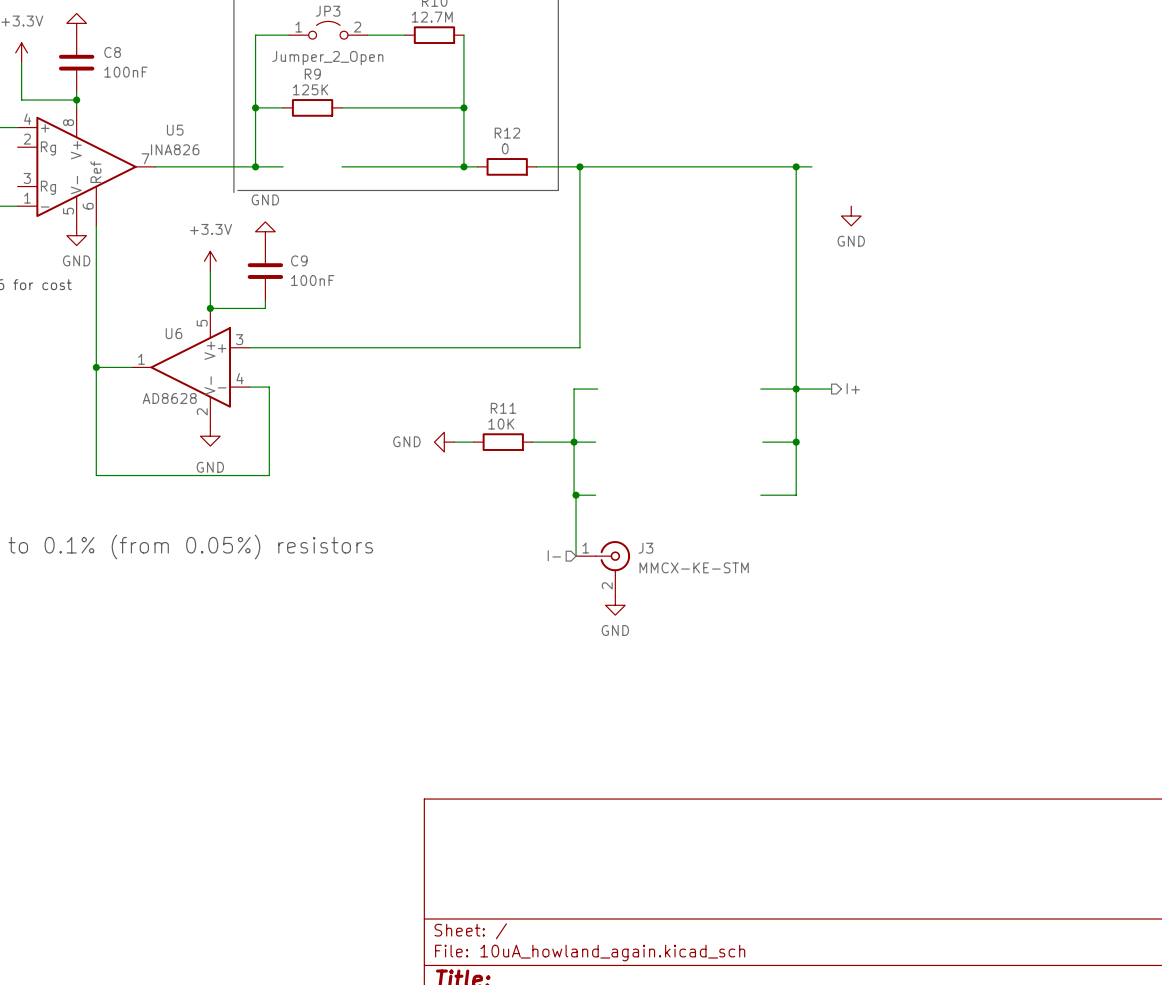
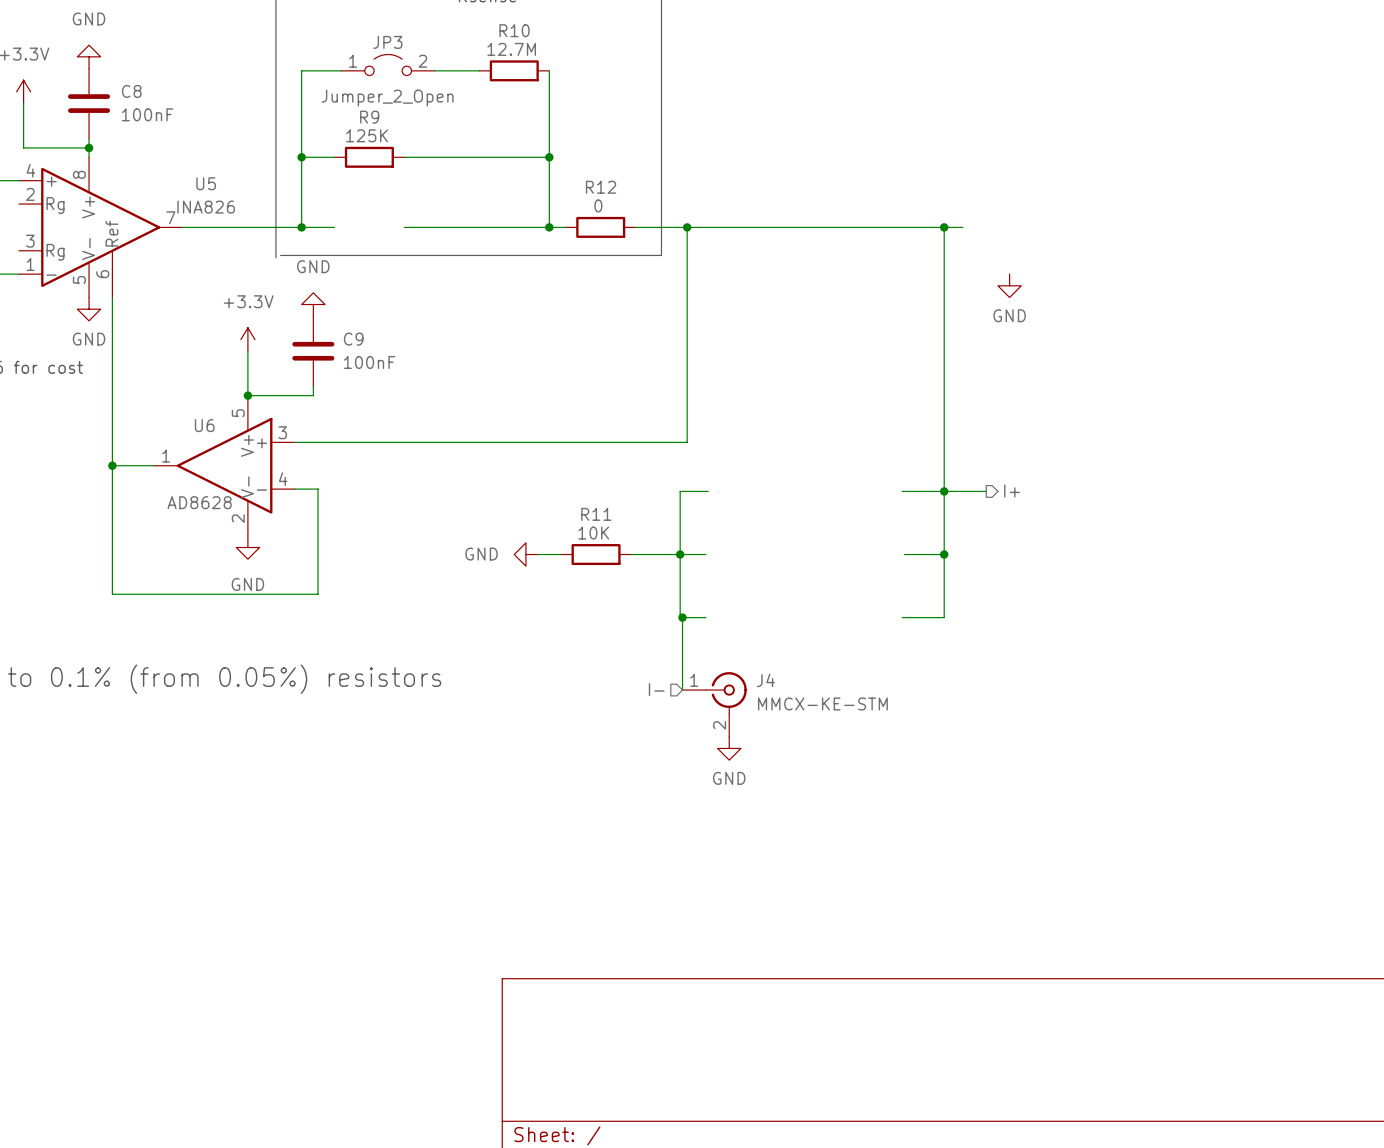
J3 name: J3 (645, 548) -> J4 (765, 680)

